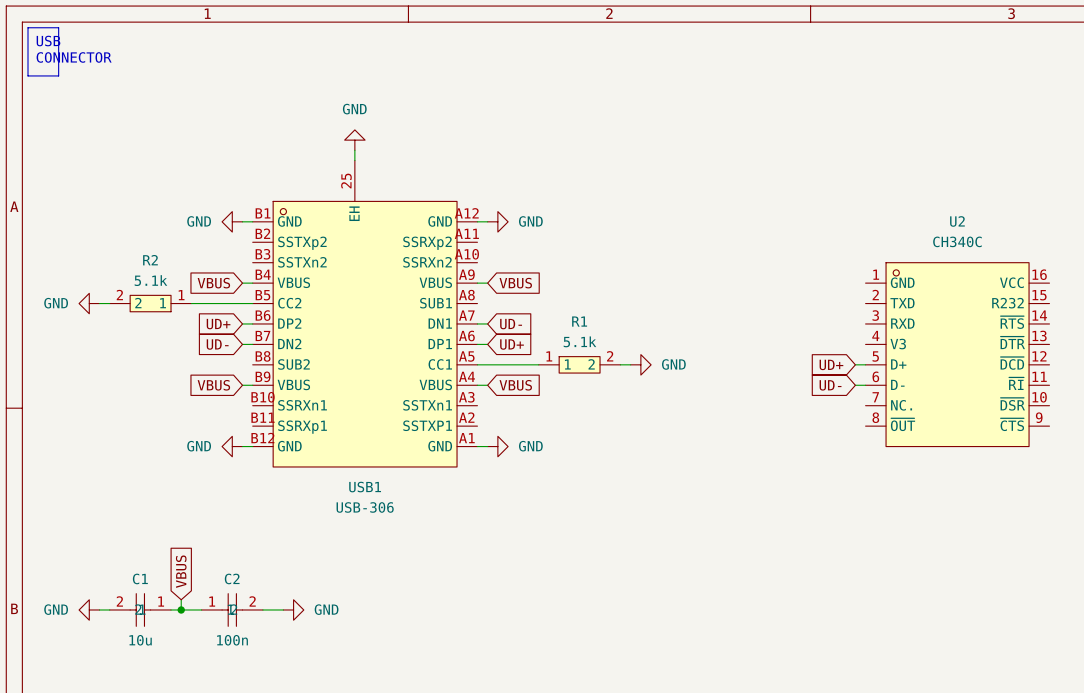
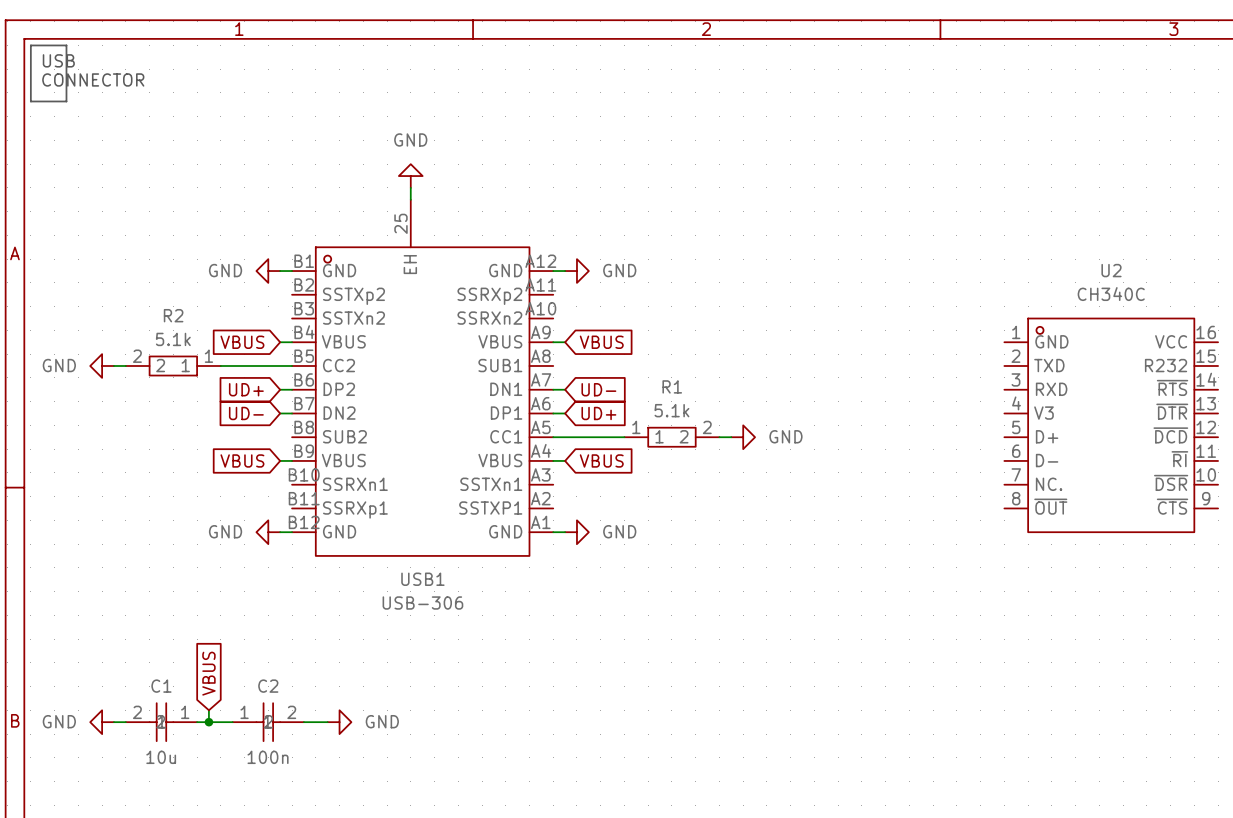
global label: UD+ (831, 364) -> none
wire: (855, 364) (865, 364) -> none
global label: UD- (830, 385) -> none
wire: (855, 385) (865, 385) -> none

